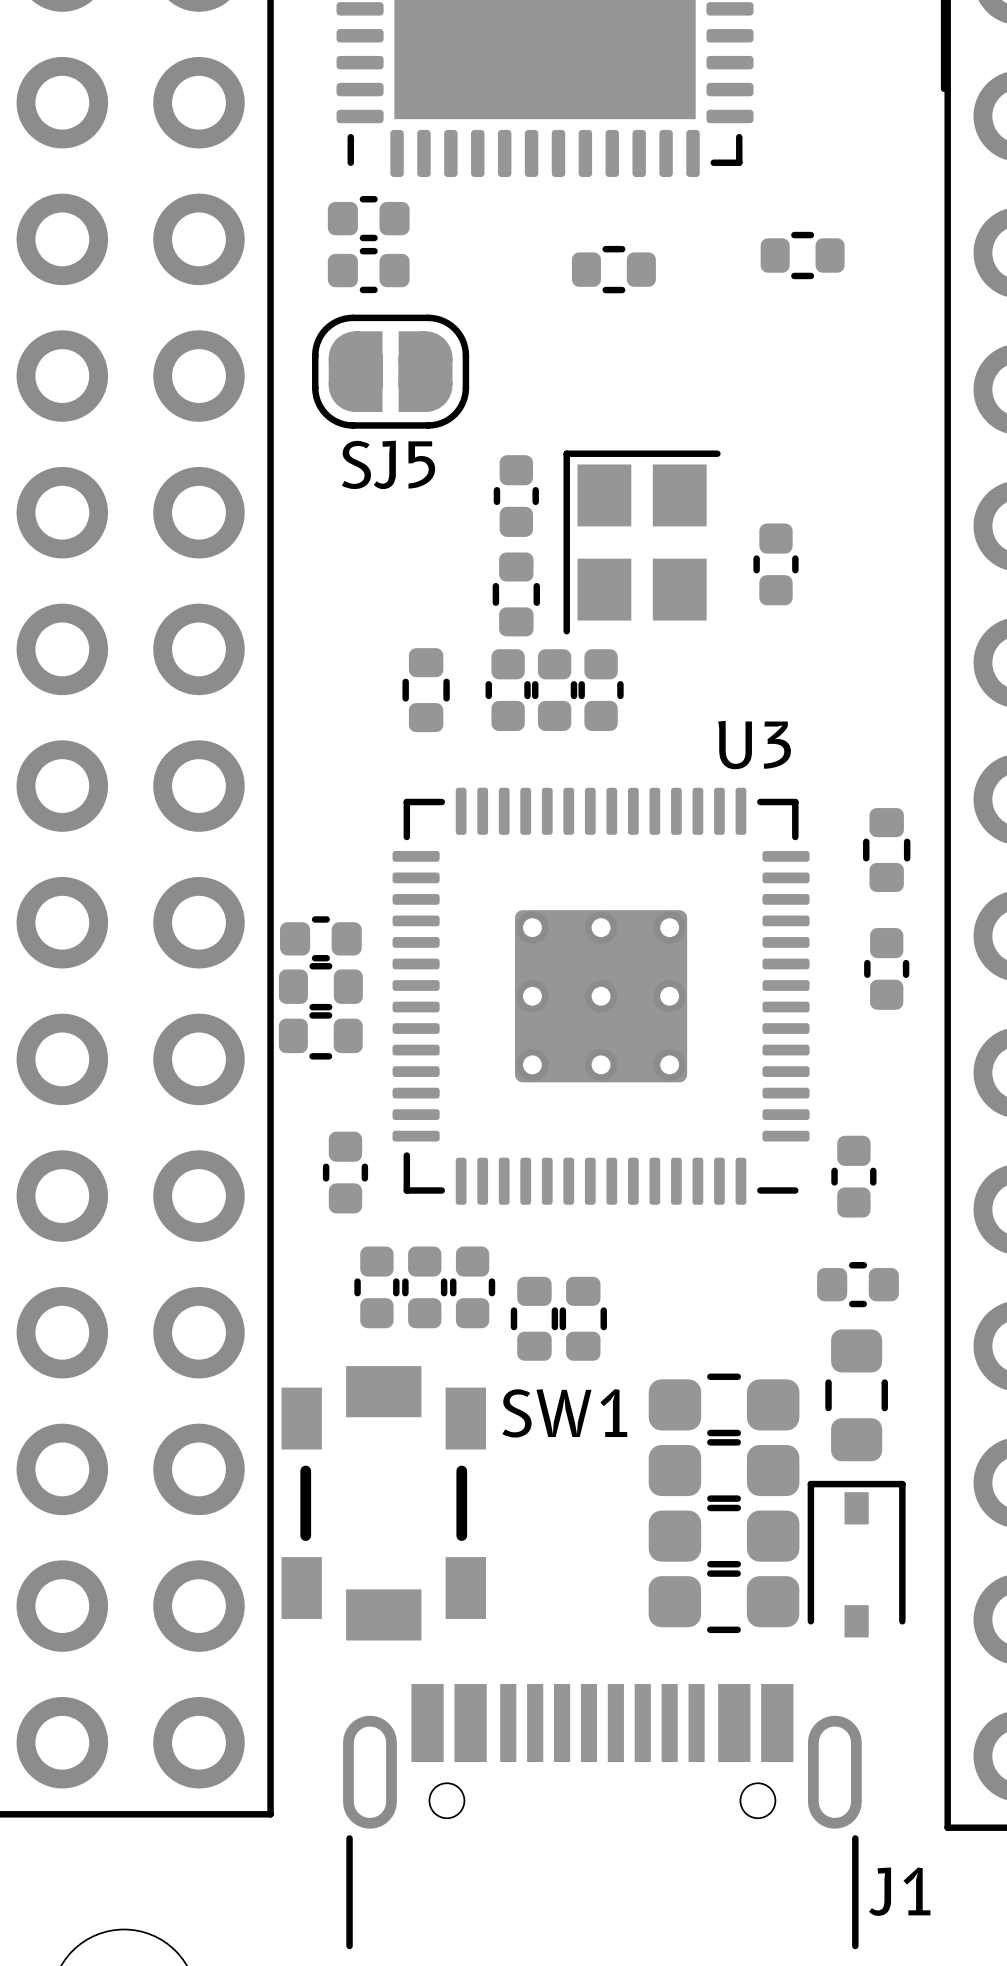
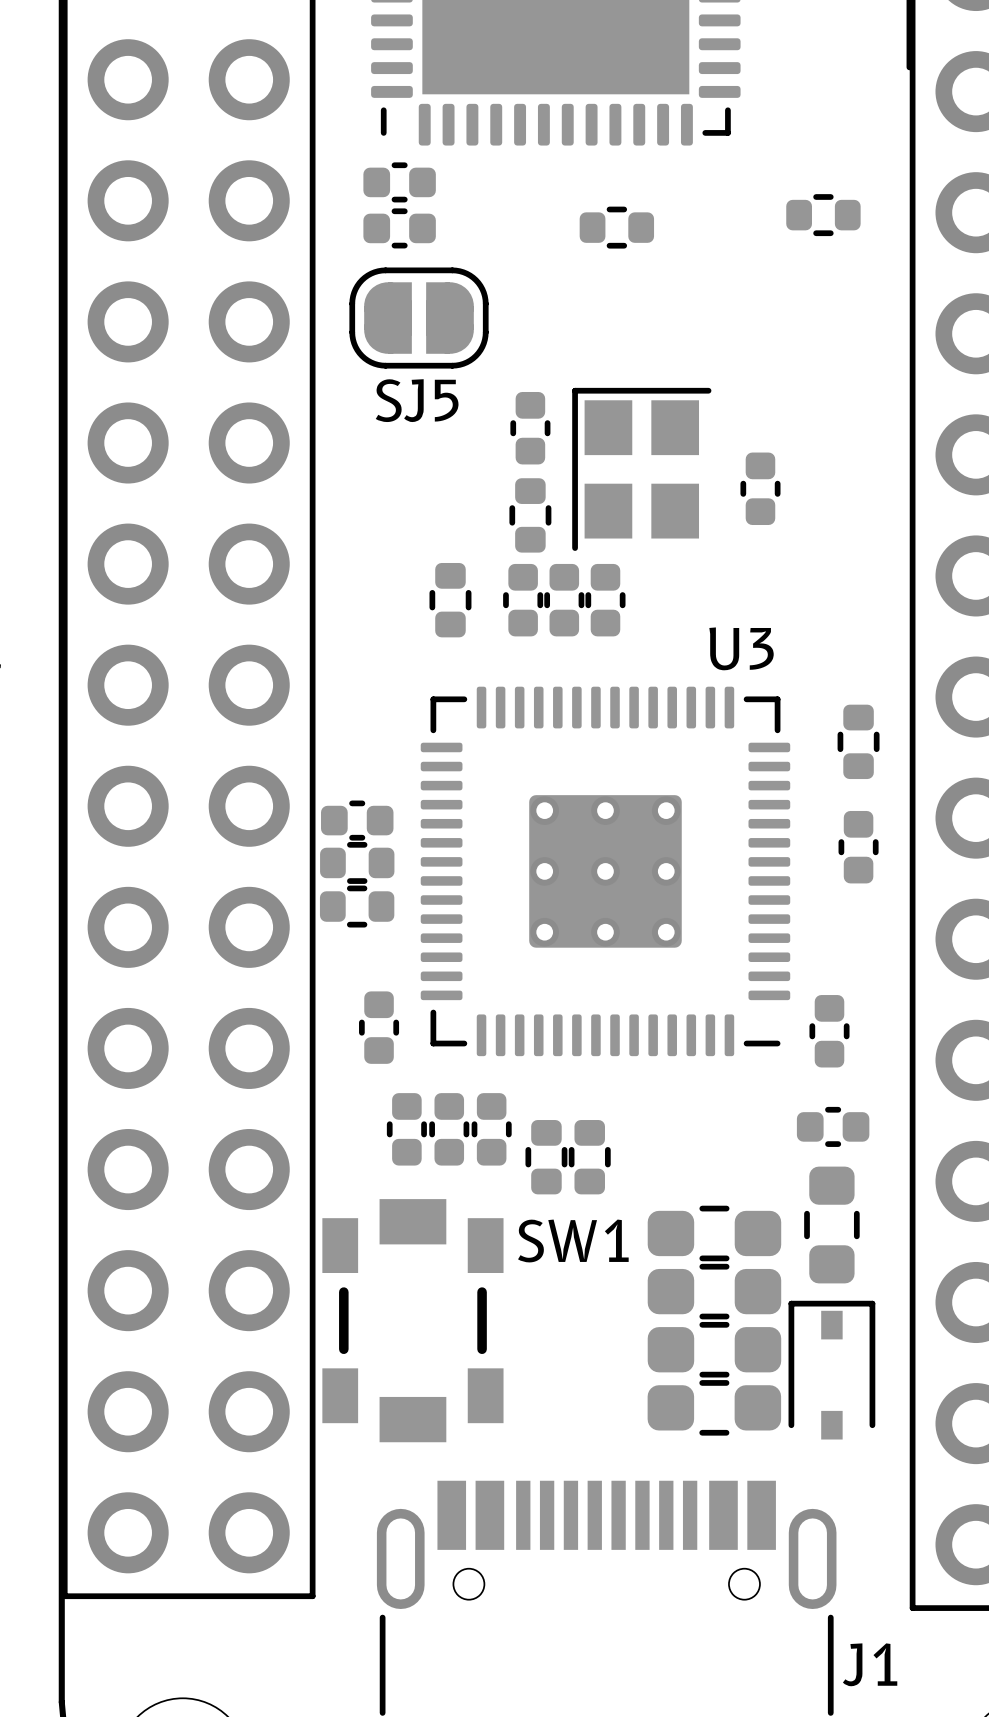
part position: (802, 255) -> (823, 215)

